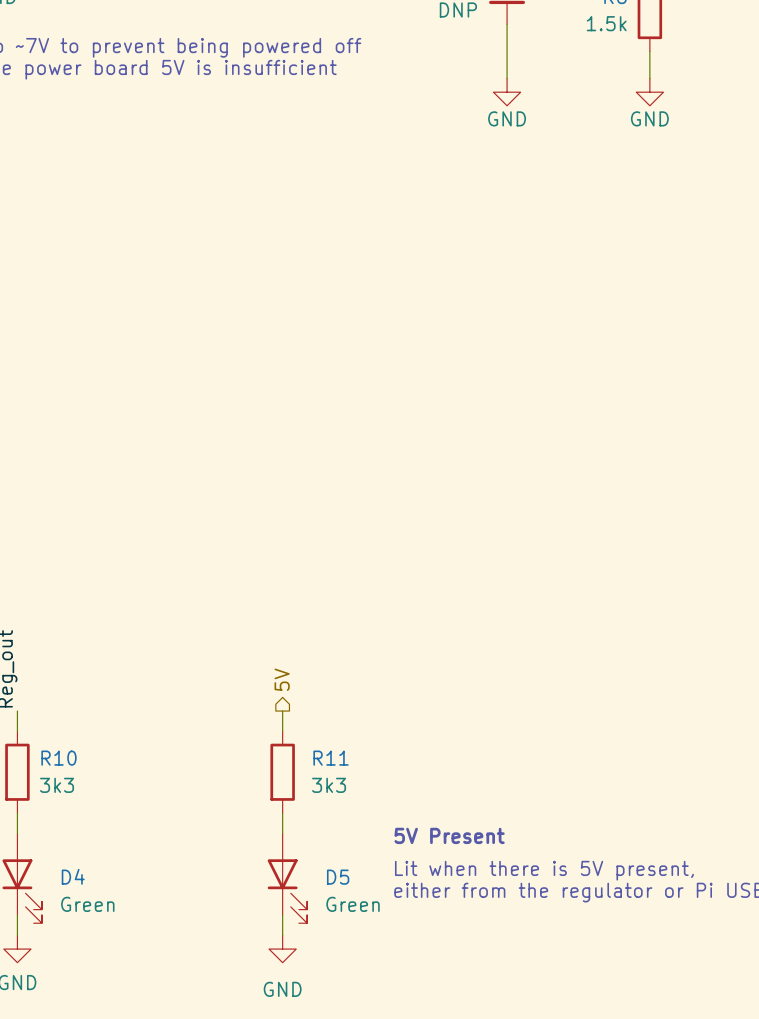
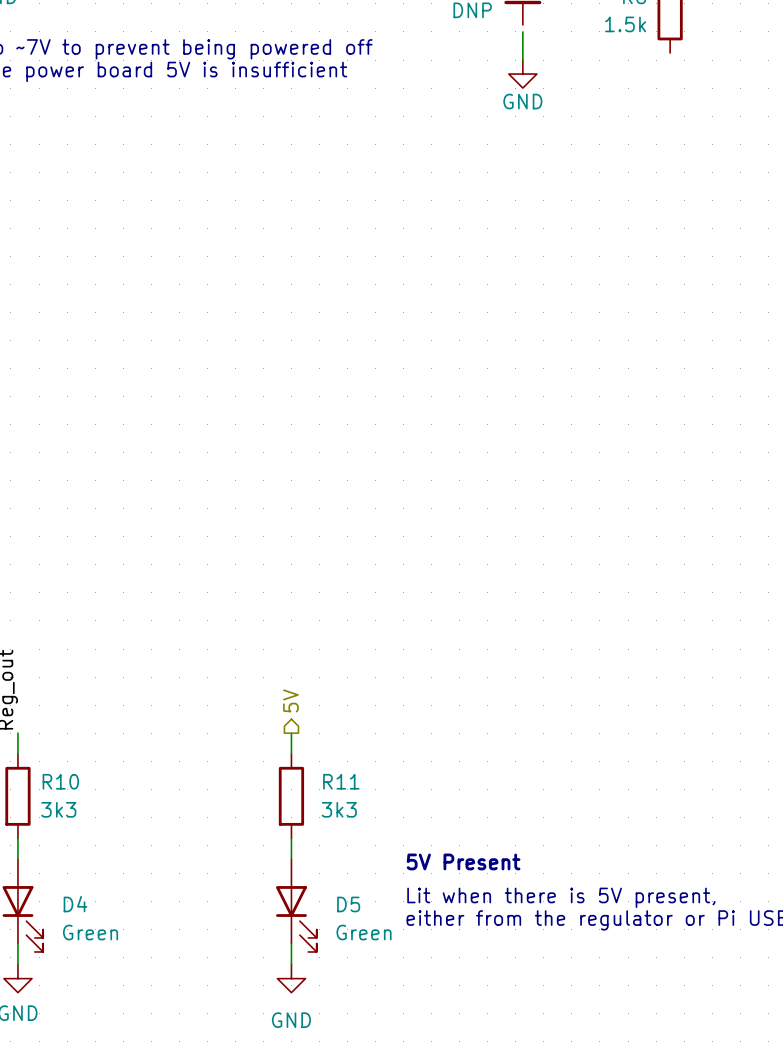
wire: (507, 24) (507, 30) -> none
wire: (649, 51) (649, 78) -> none
power symbol position: GND (507, 92) -> GND (522, 74)
power symbol: GND (649, 92) -> none

